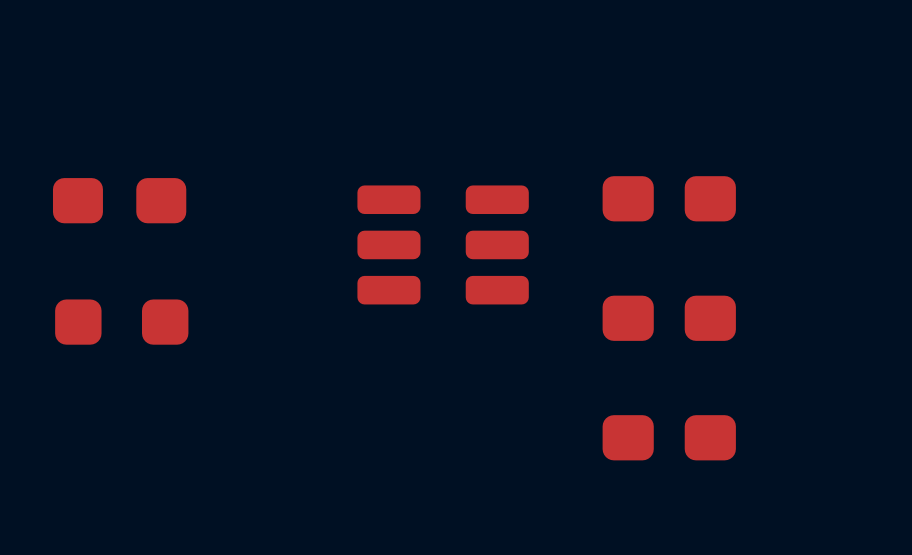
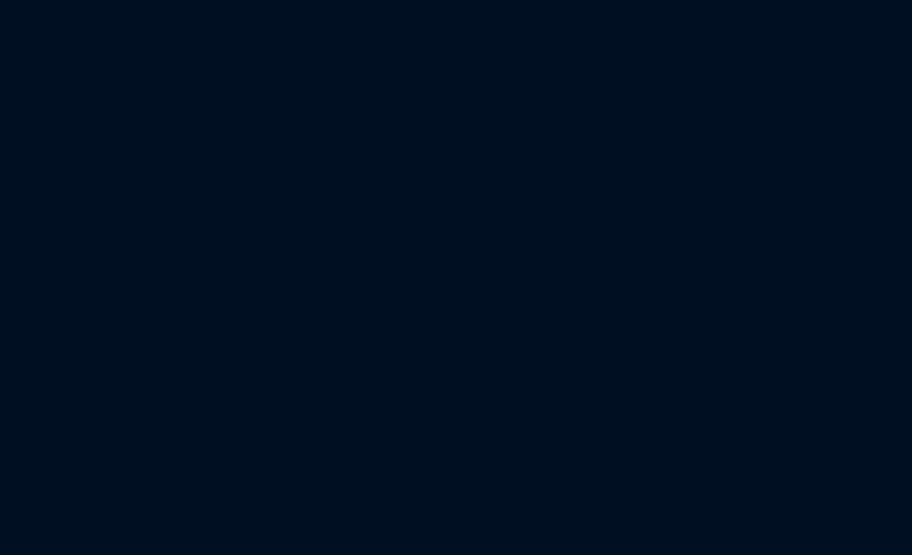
part: (669, 198) -> none
part: (119, 200) -> none
part: (443, 244) -> none
part: (669, 318) -> none
part: (121, 322) -> none
part: (669, 437) -> none

